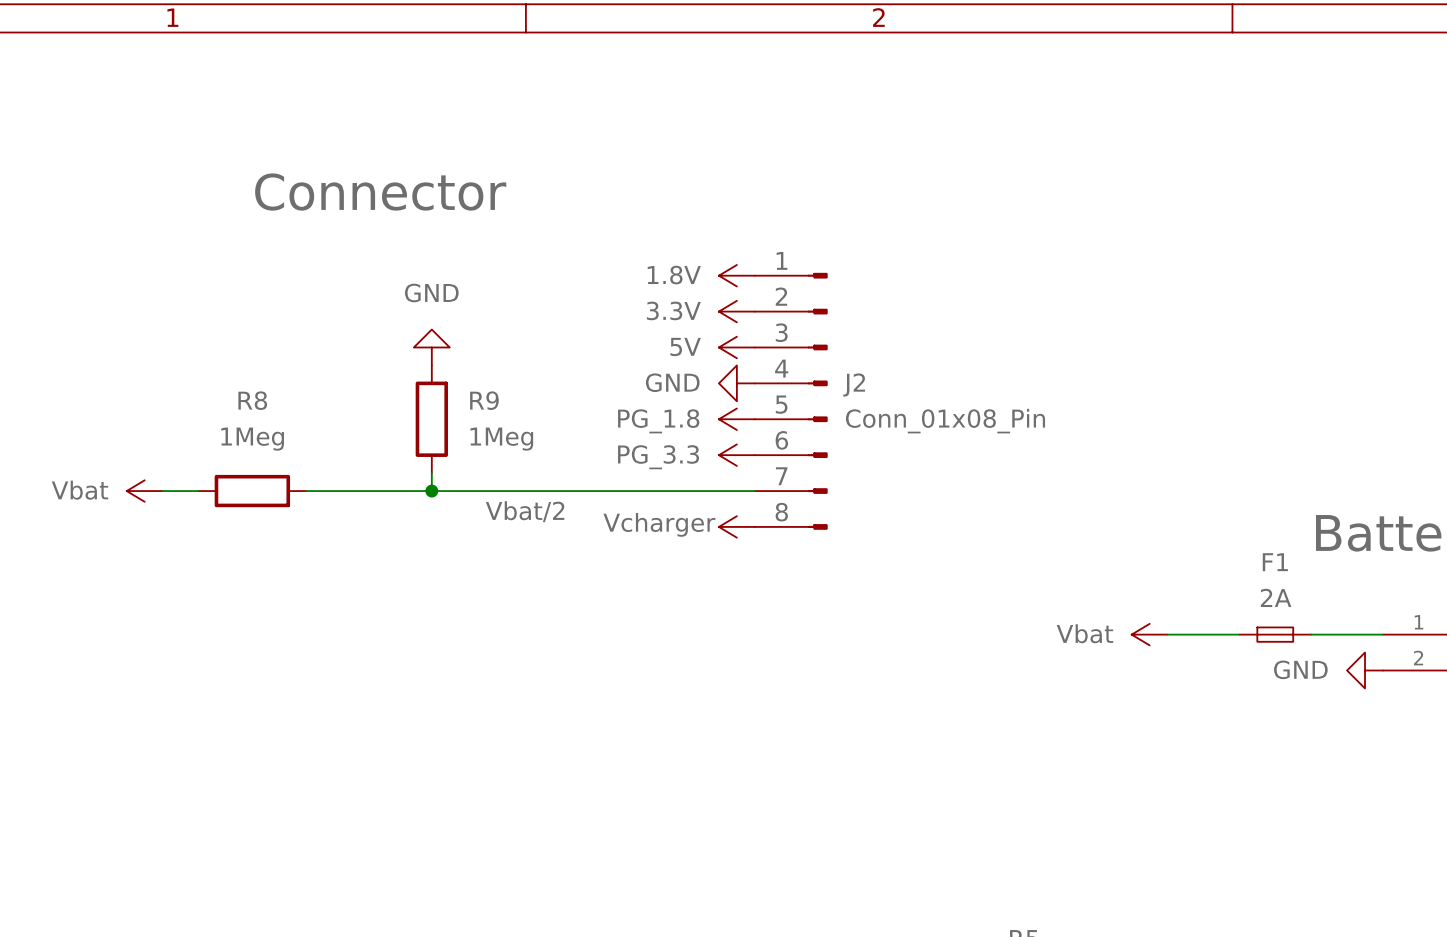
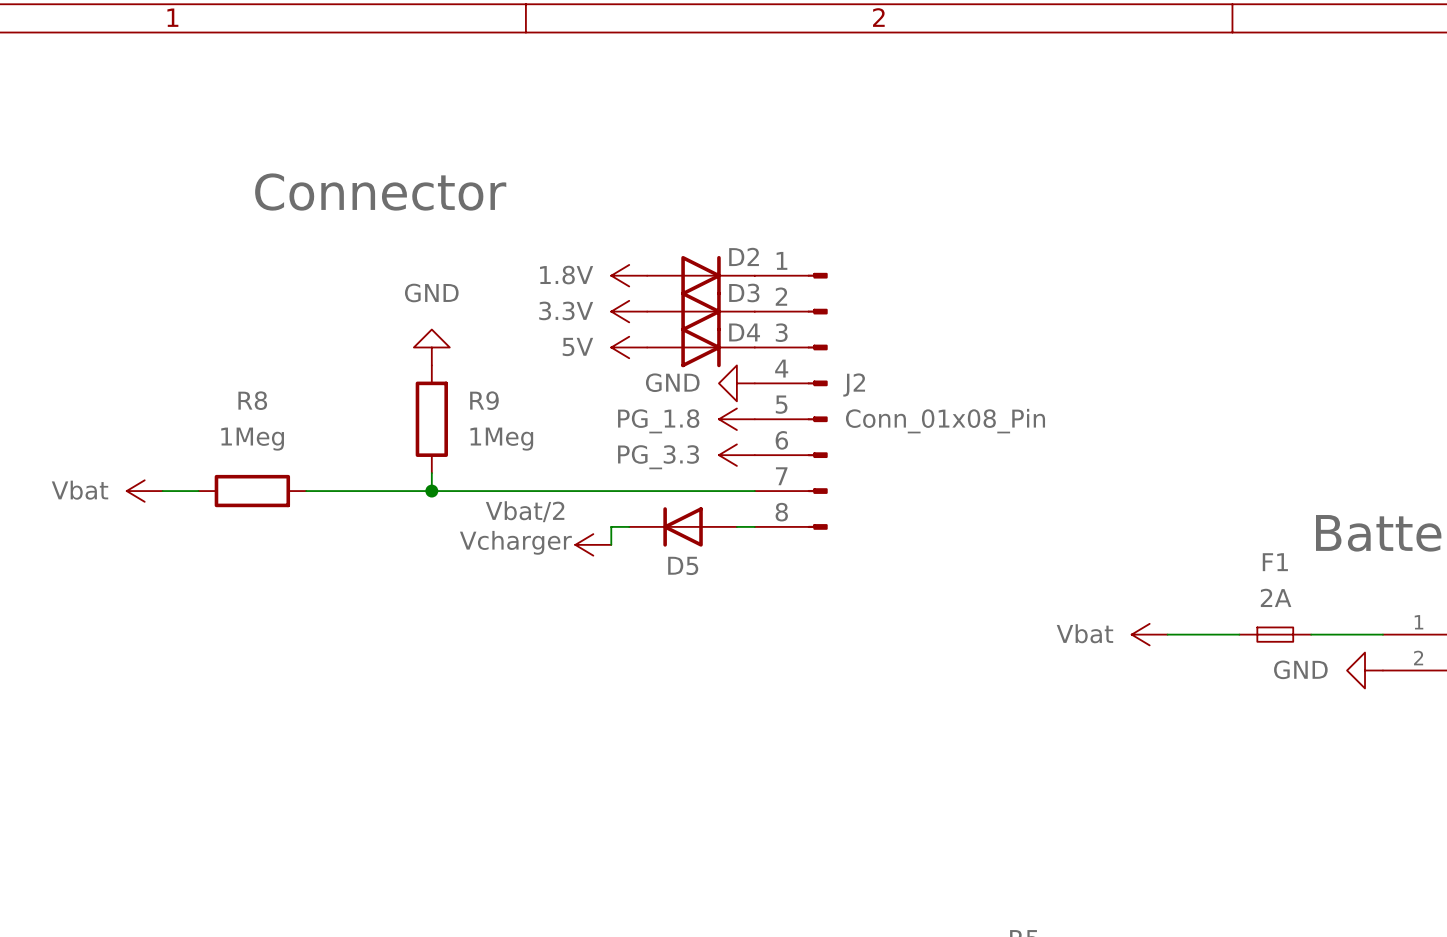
D2: none -> (701, 275)
power symbol position: 1.8V (736, 275) -> 1.8V (629, 275)
D3: none -> (701, 311)
power symbol position: 3.3V (736, 311) -> 3.3V (629, 311)
D4: none -> (701, 347)
power symbol position: 5V (736, 347) -> 5V (629, 347)
wire: none -> (629, 526) (611, 526) (611, 544)
D5: none -> (683, 526)
power symbol position: Vcharger (736, 526) -> Vcharger (593, 544)

